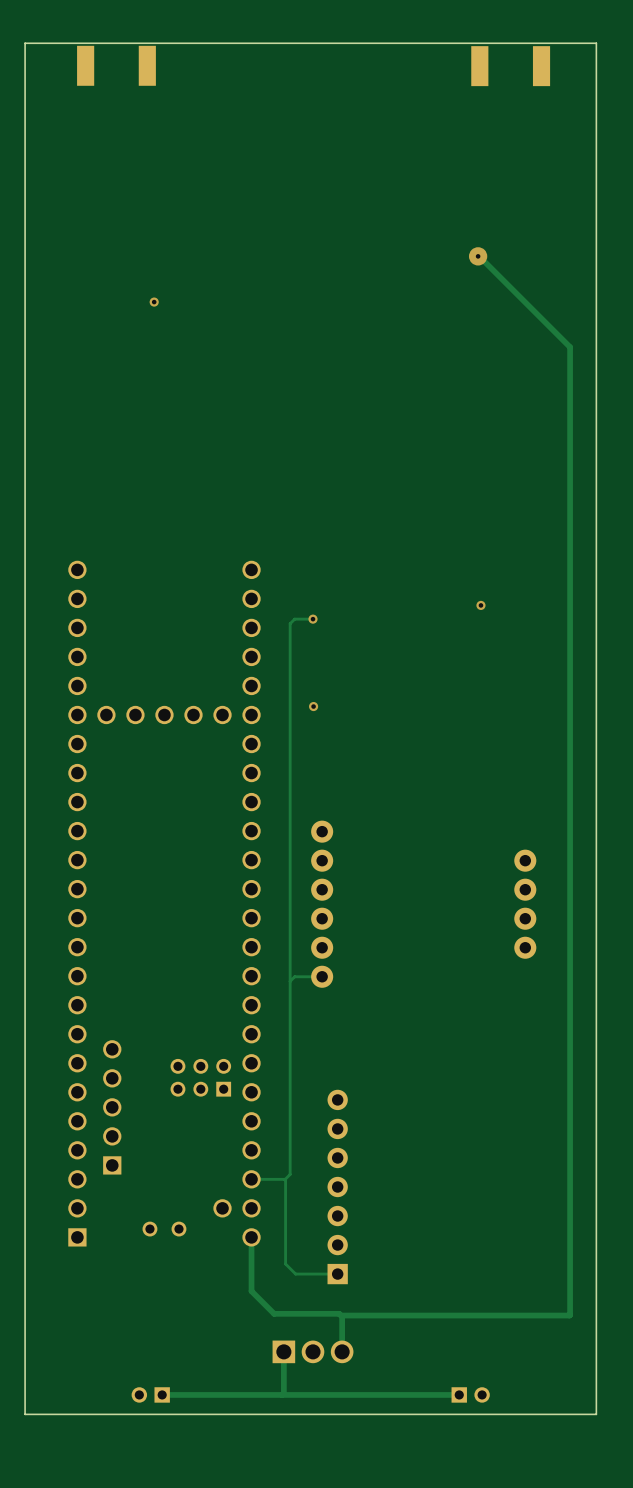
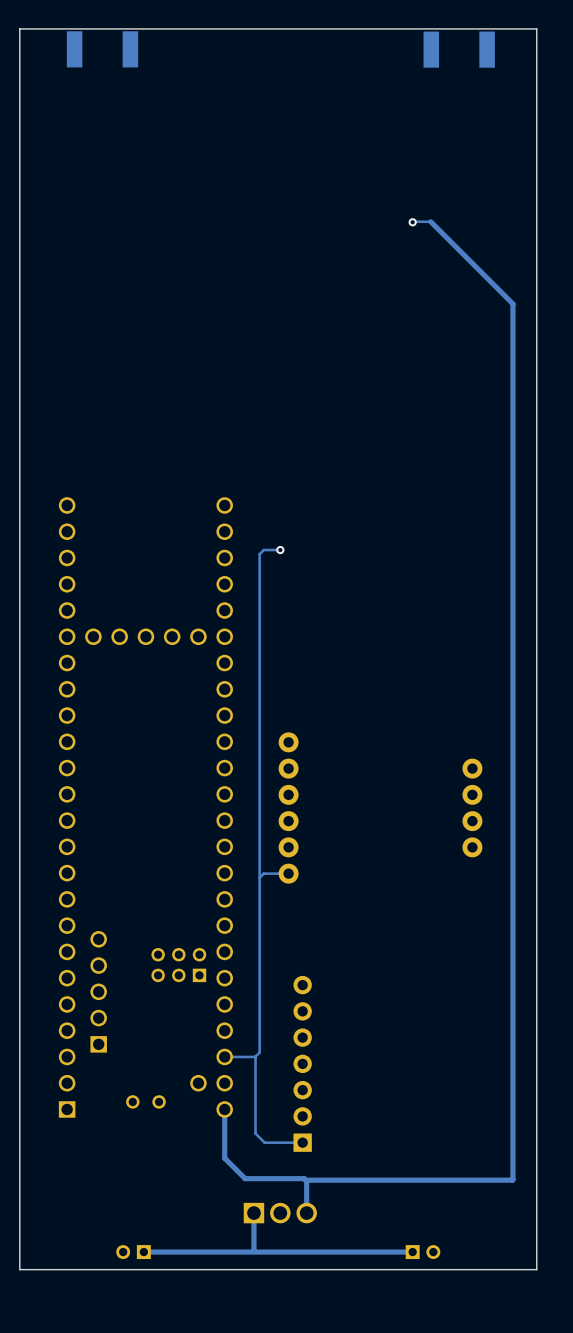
via: none -> (412, 222)
via: (478, 256) -> none
track: none -> (430, 221) (412, 222)
via: (154, 302) -> none
via: (480, 605) -> none
via: (313, 706) -> none

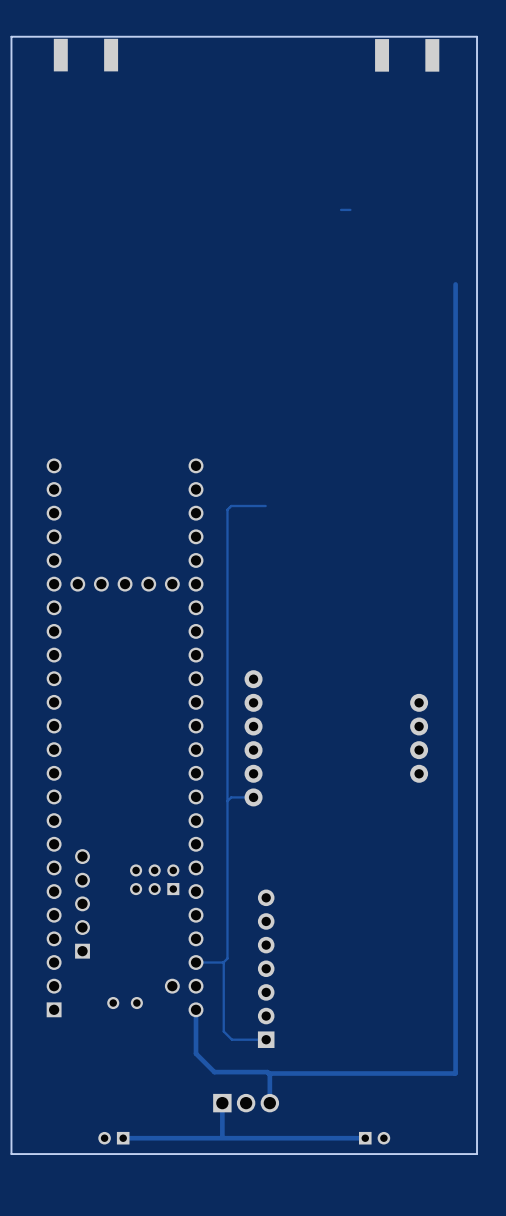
track: none -> (350, 209) (341, 209)
track: (412, 222) (430, 221) (512, 303) -> none
via: (412, 222) -> none
via: (280, 550) -> none
track: none -> (265, 506) (246, 506)

